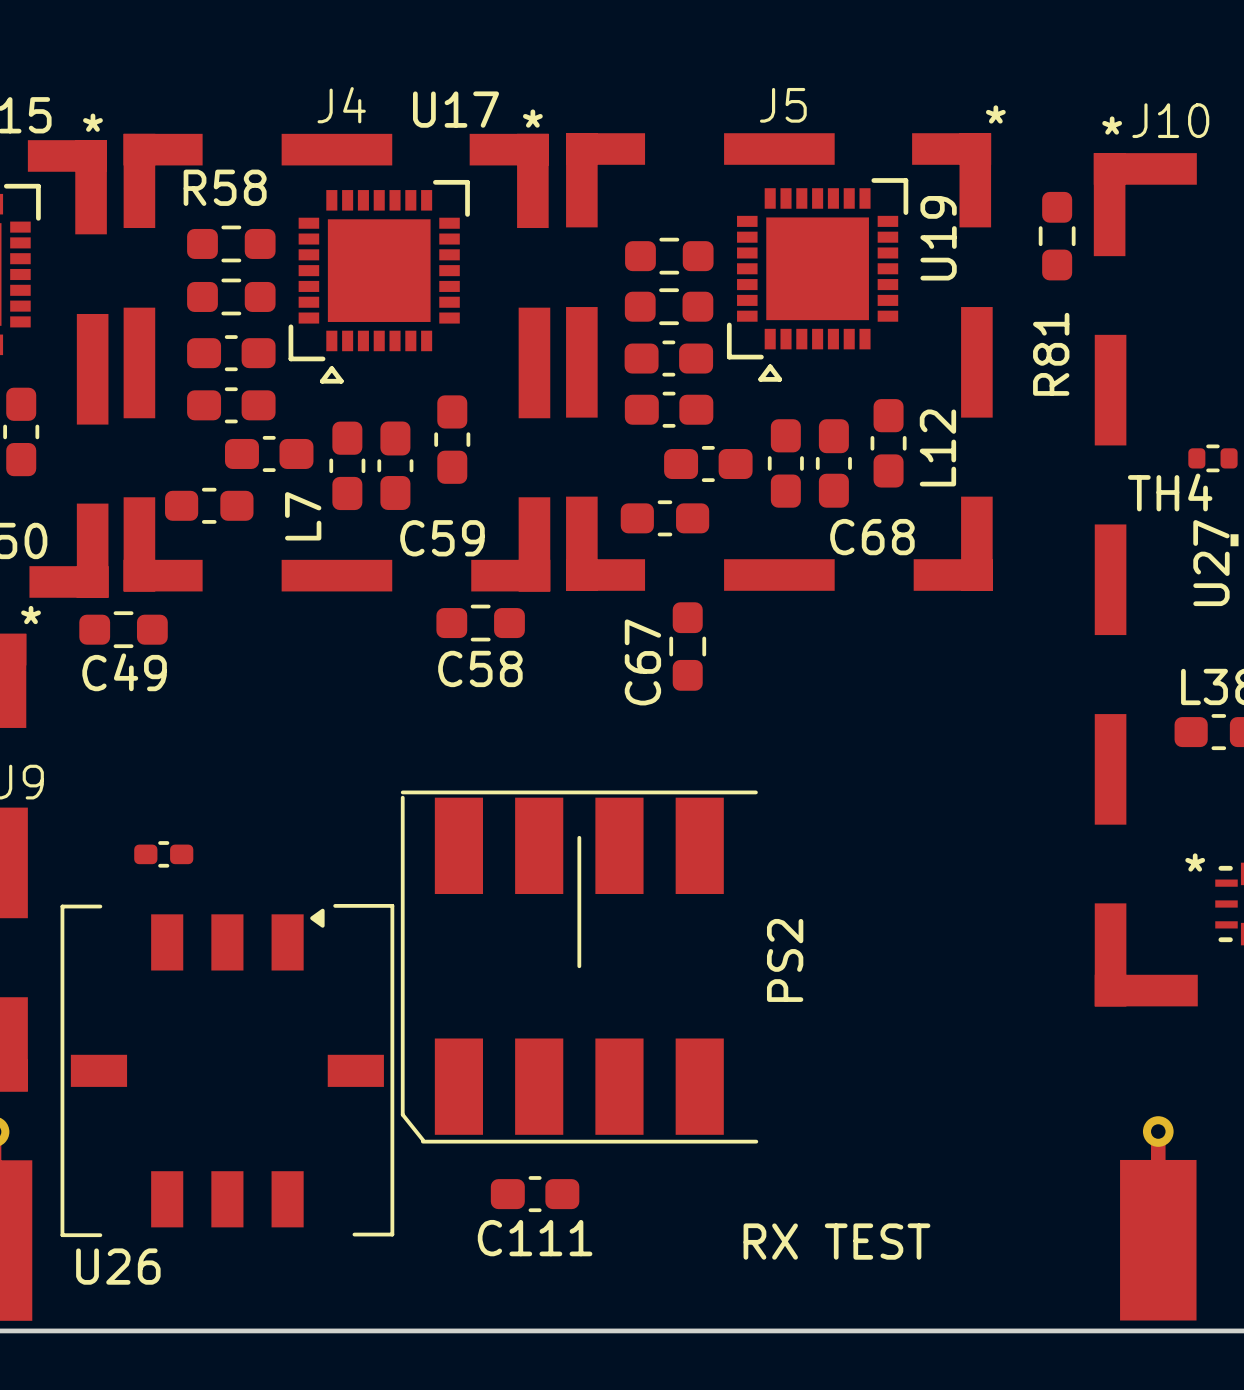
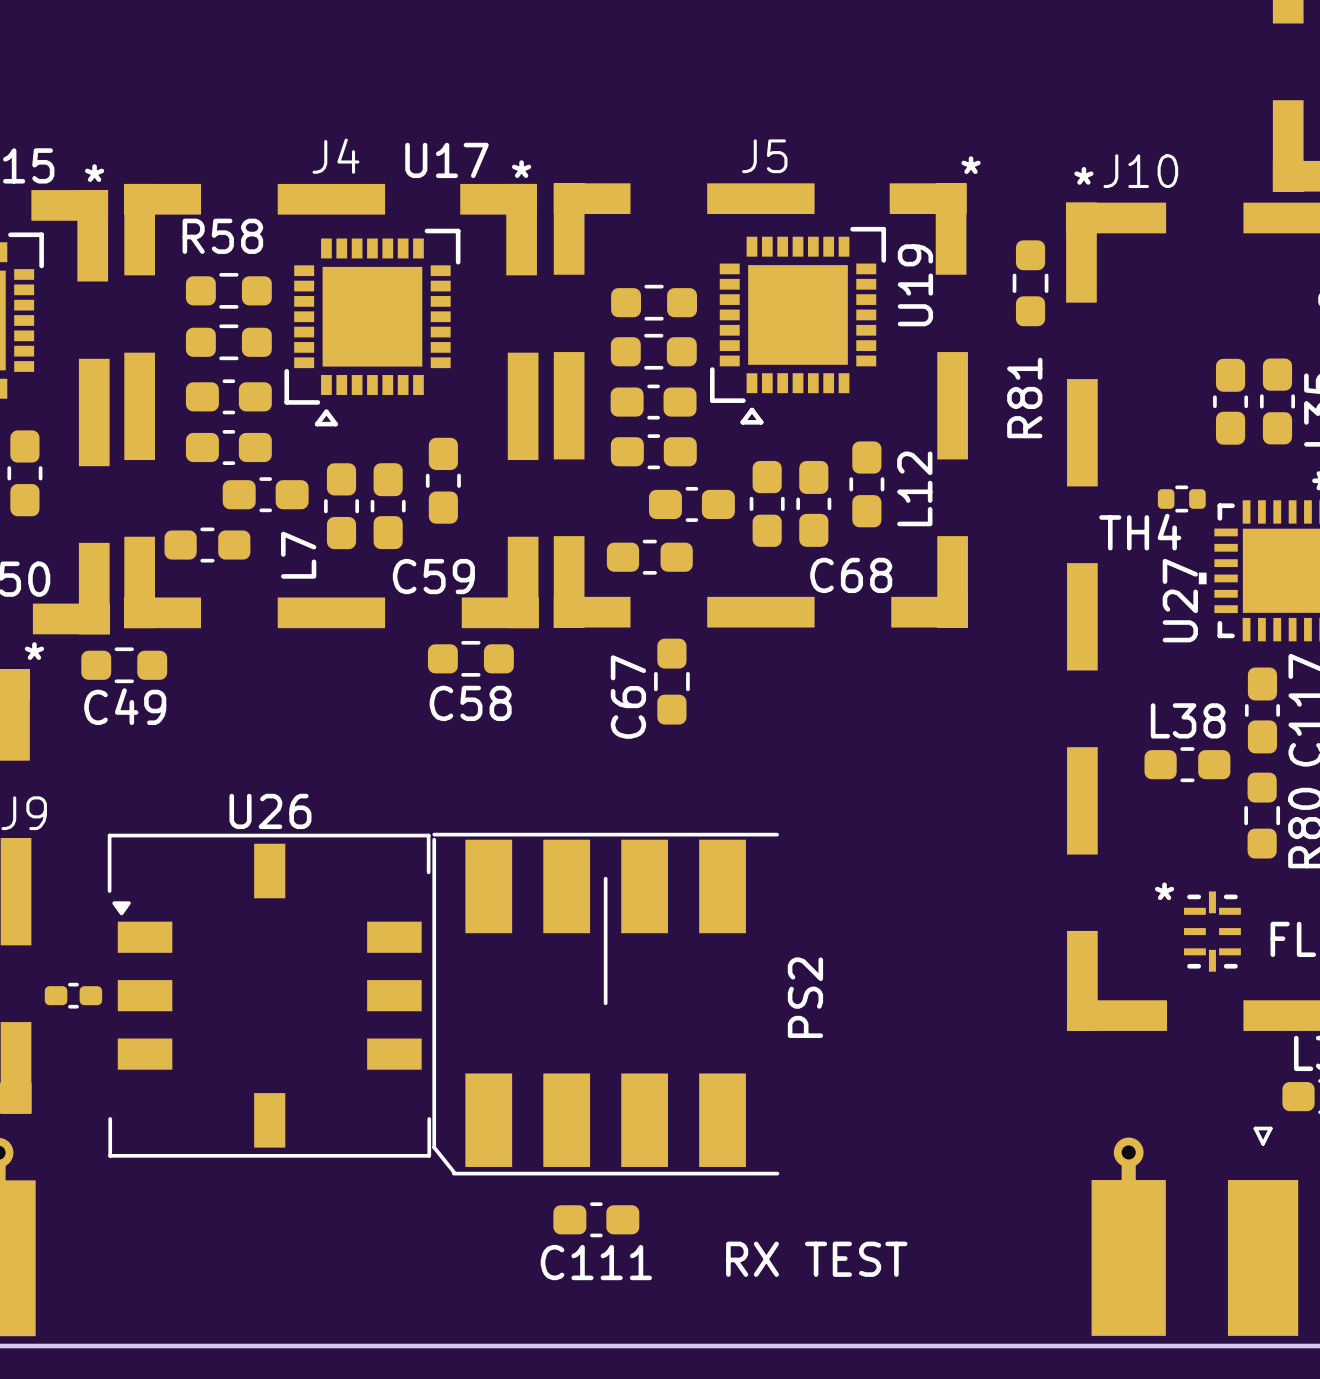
part position: (163, 854) -> (73, 995)
PS2 position: (579, 967) -> (605, 1004)
U26 rotation: 0° (227, 1070) -> 90° counterclockwise (269, 995)
C111 position: (535, 1194) -> (596, 1219)
U26 name position: U26 (118, 1266) -> U26 (270, 811)

